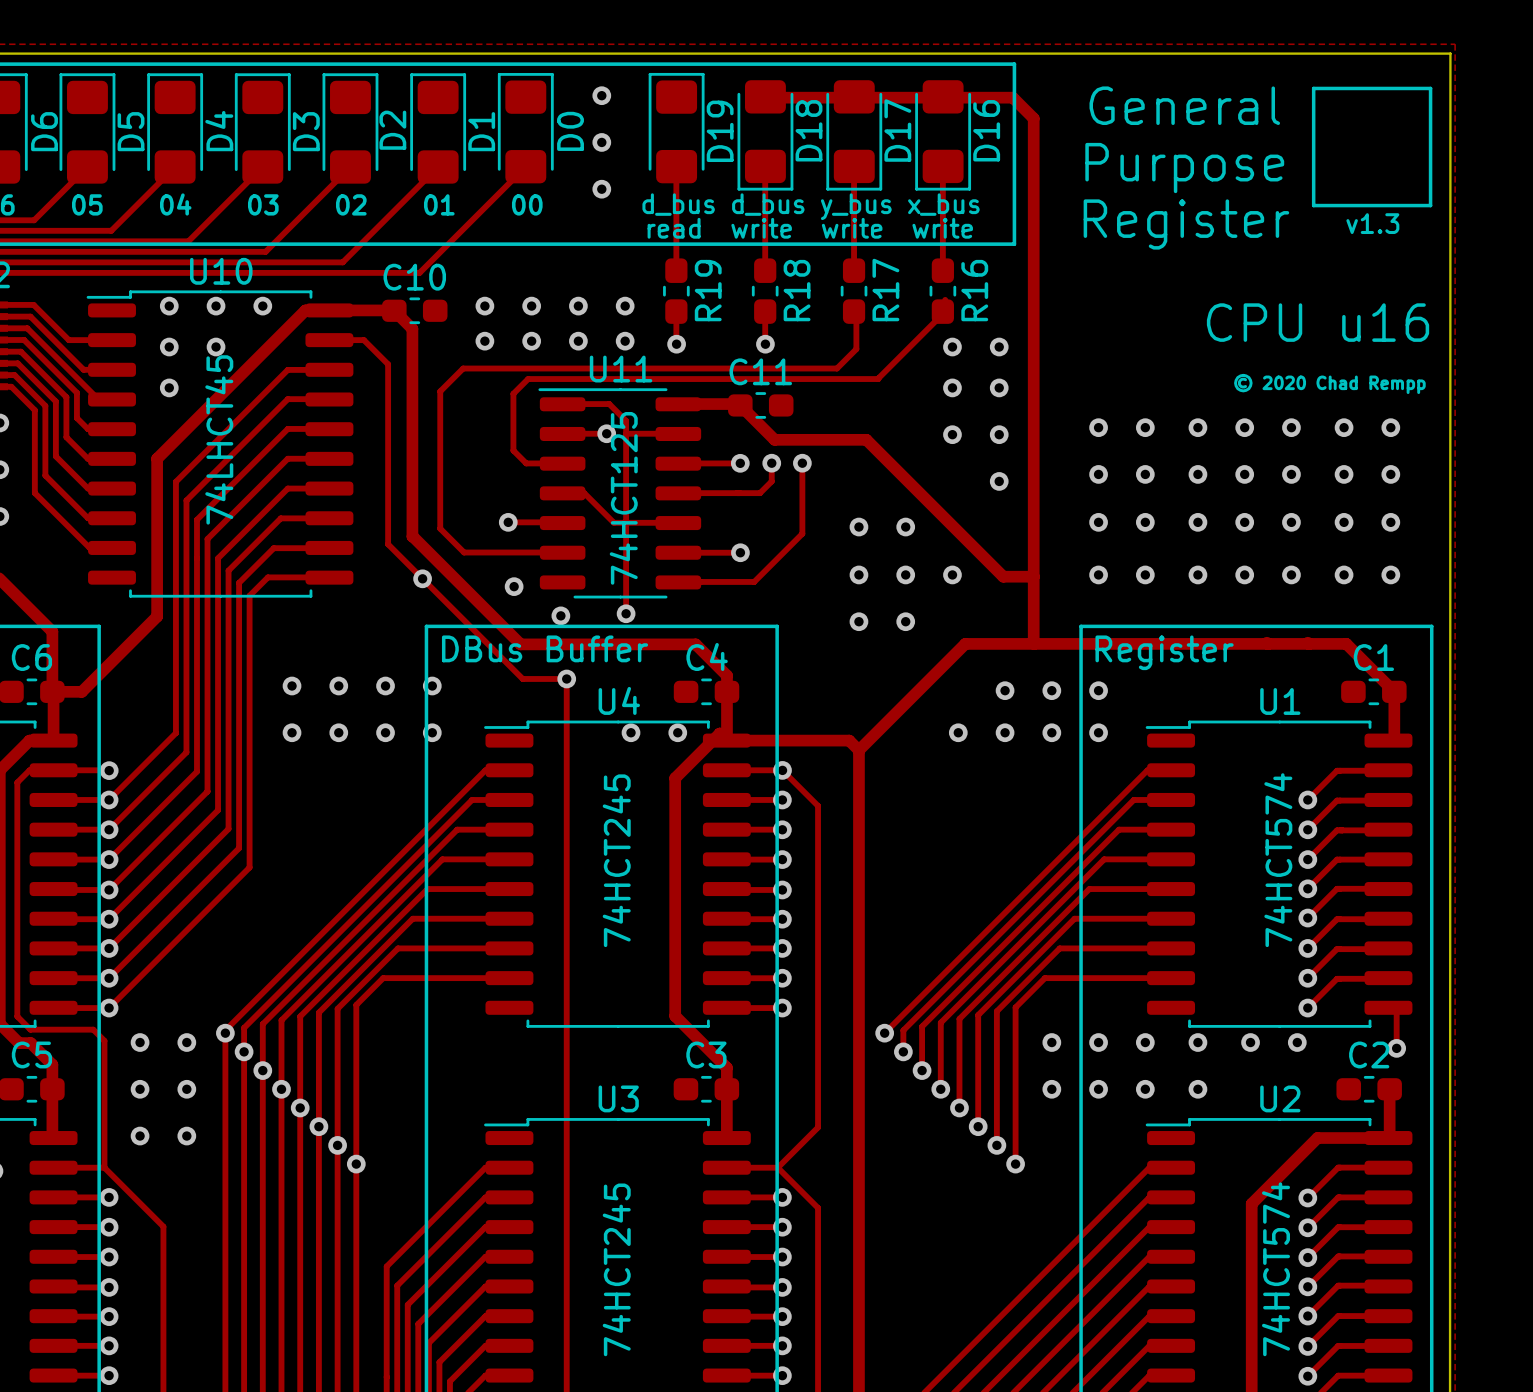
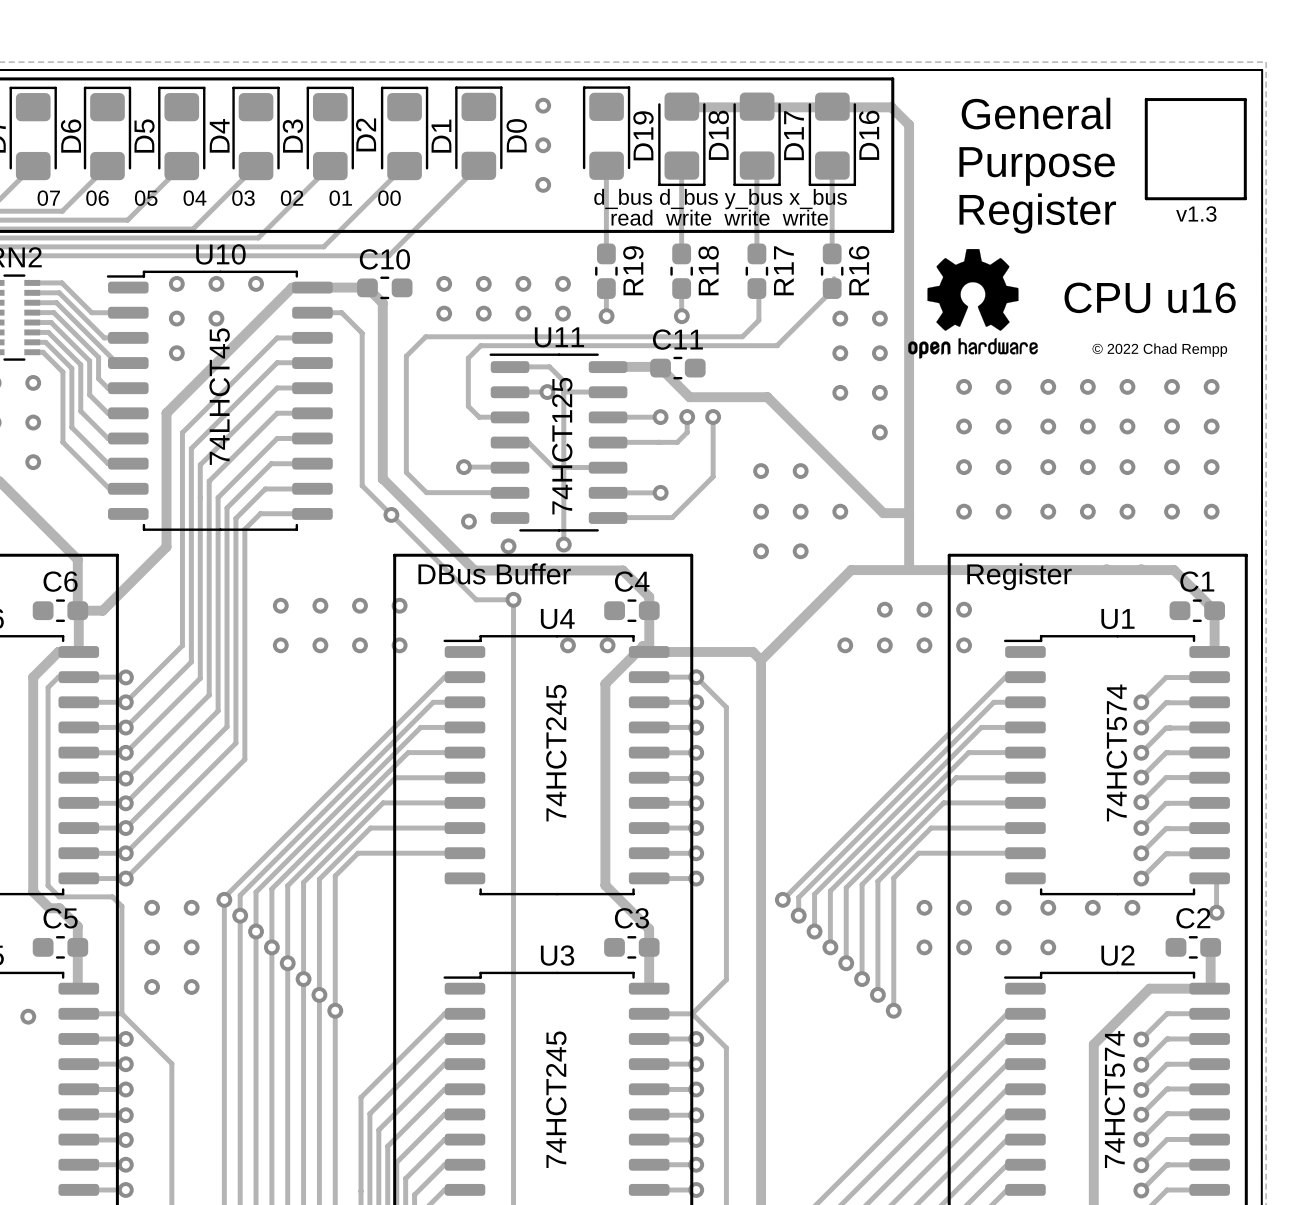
drawing: none -> [908, 248, 1038, 359]
text: © 2020 Chad Rempp (1329, 383) -> © 2022 Chad Rempp (1159, 350)

